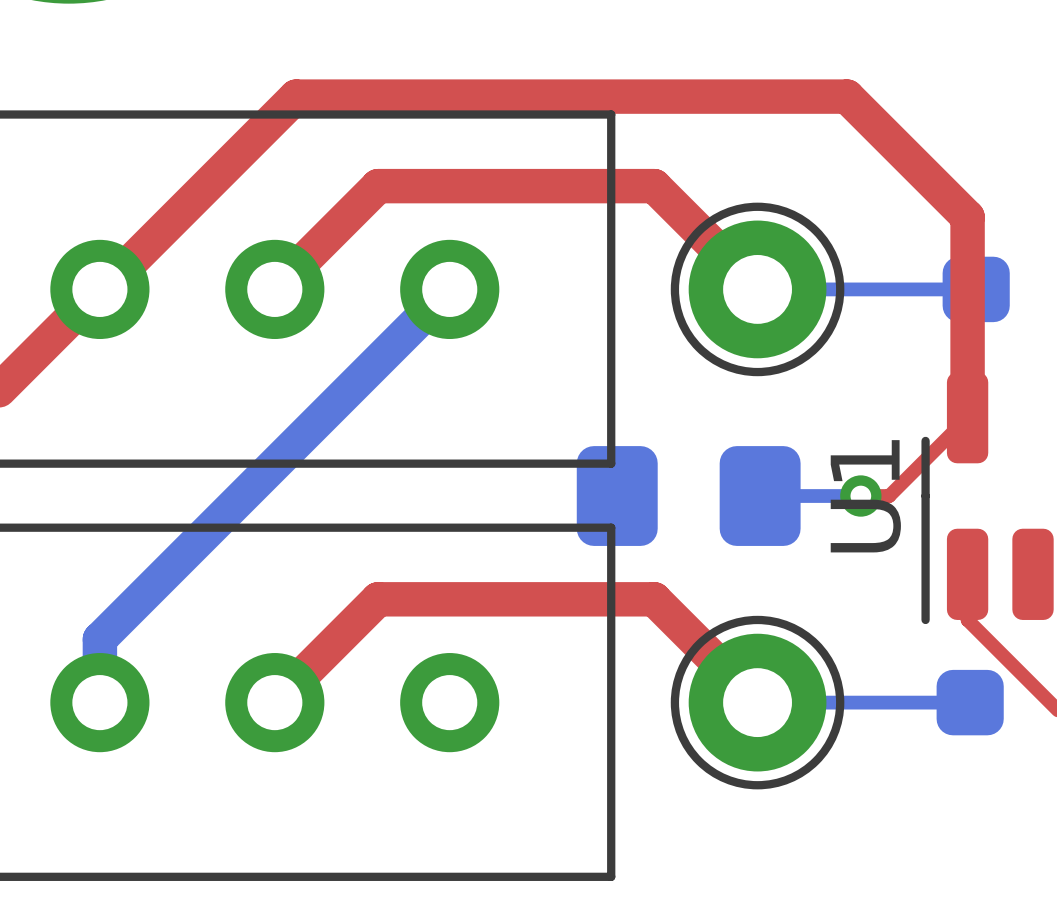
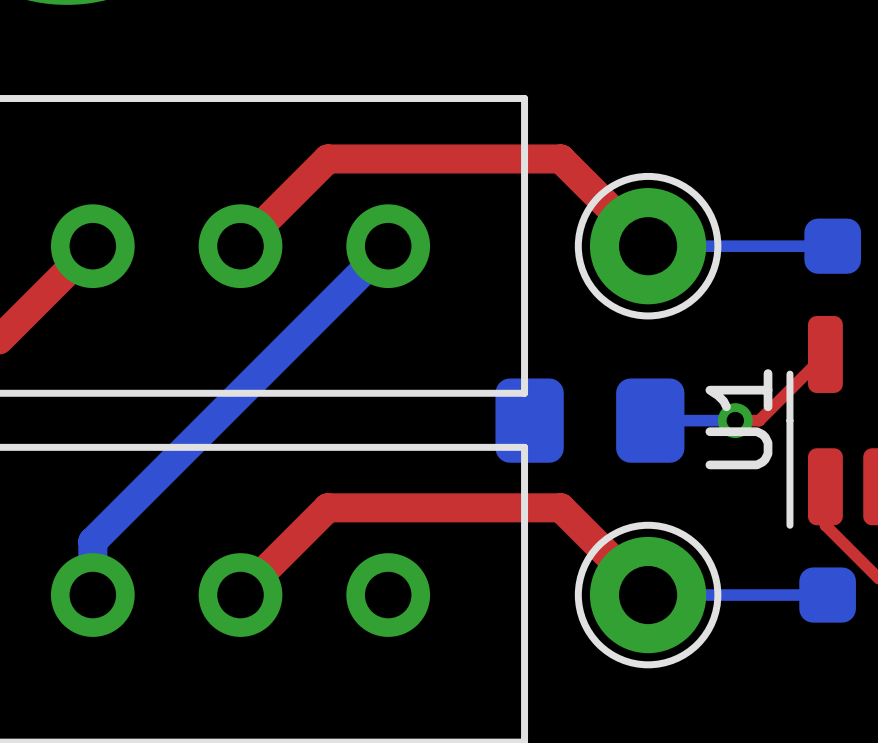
top track: (99, 289) (103, 289) (296, 96) (847, 96) (967, 217) (967, 417) -> none

